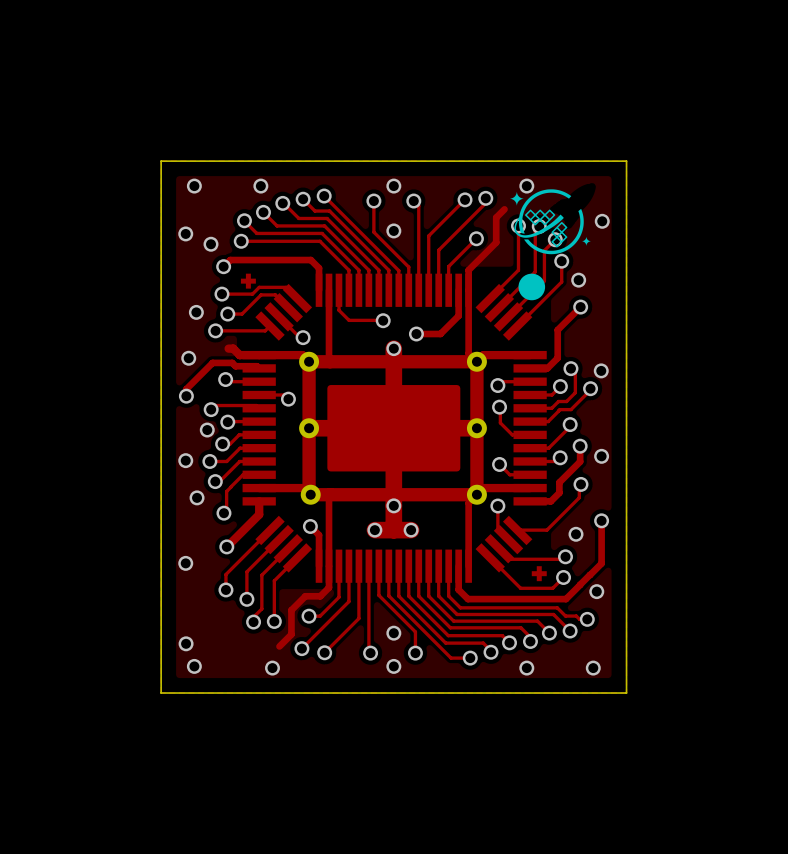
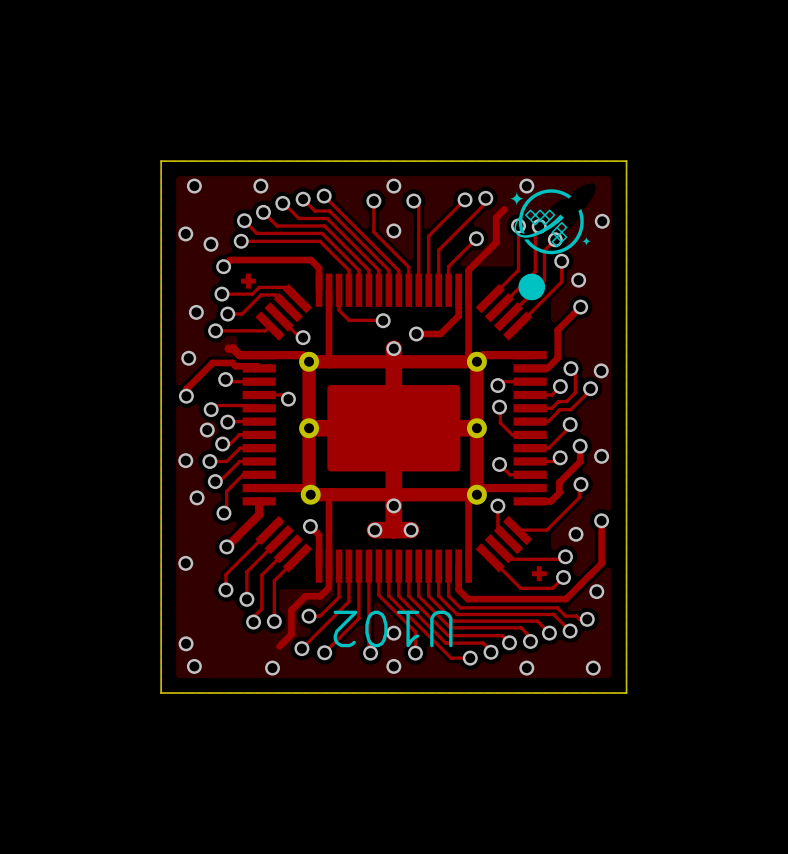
U102 name: none -> U102 (393, 628)

